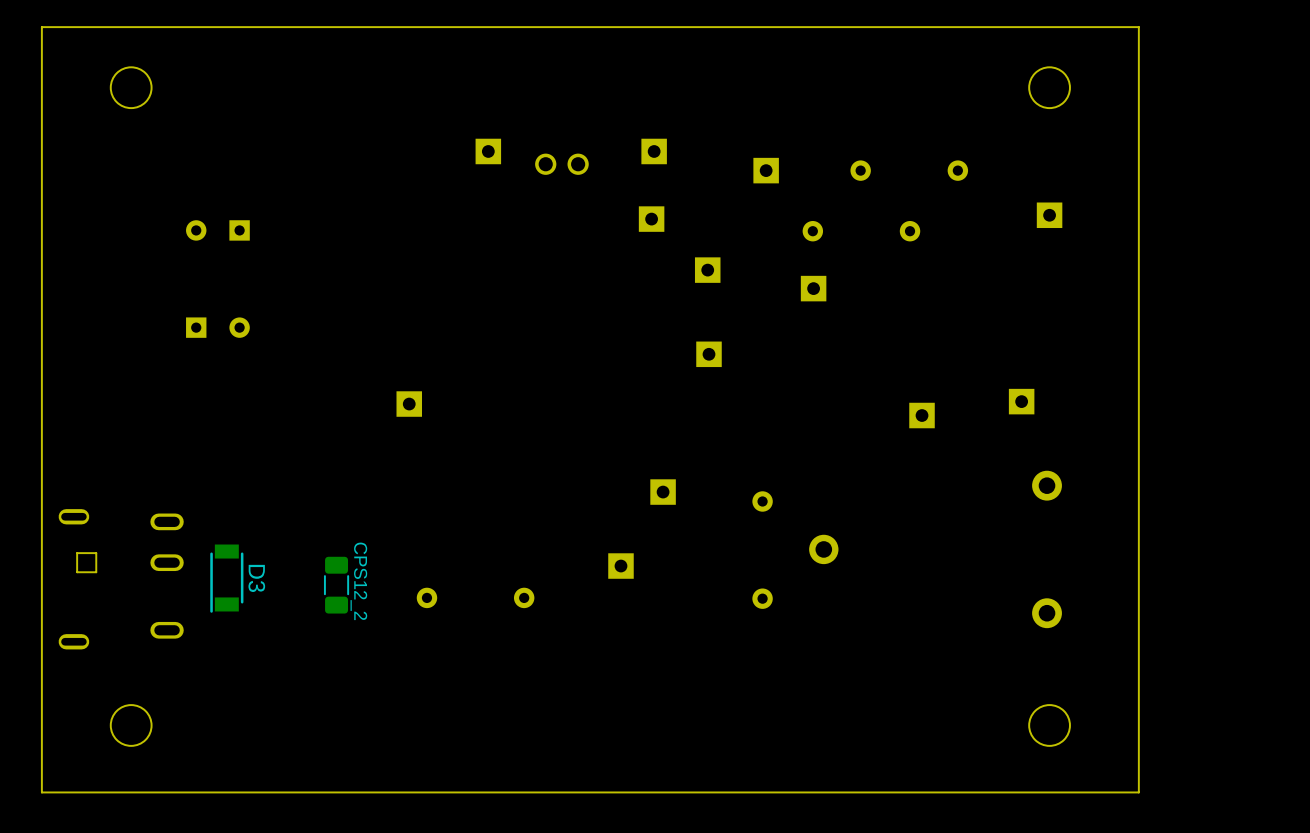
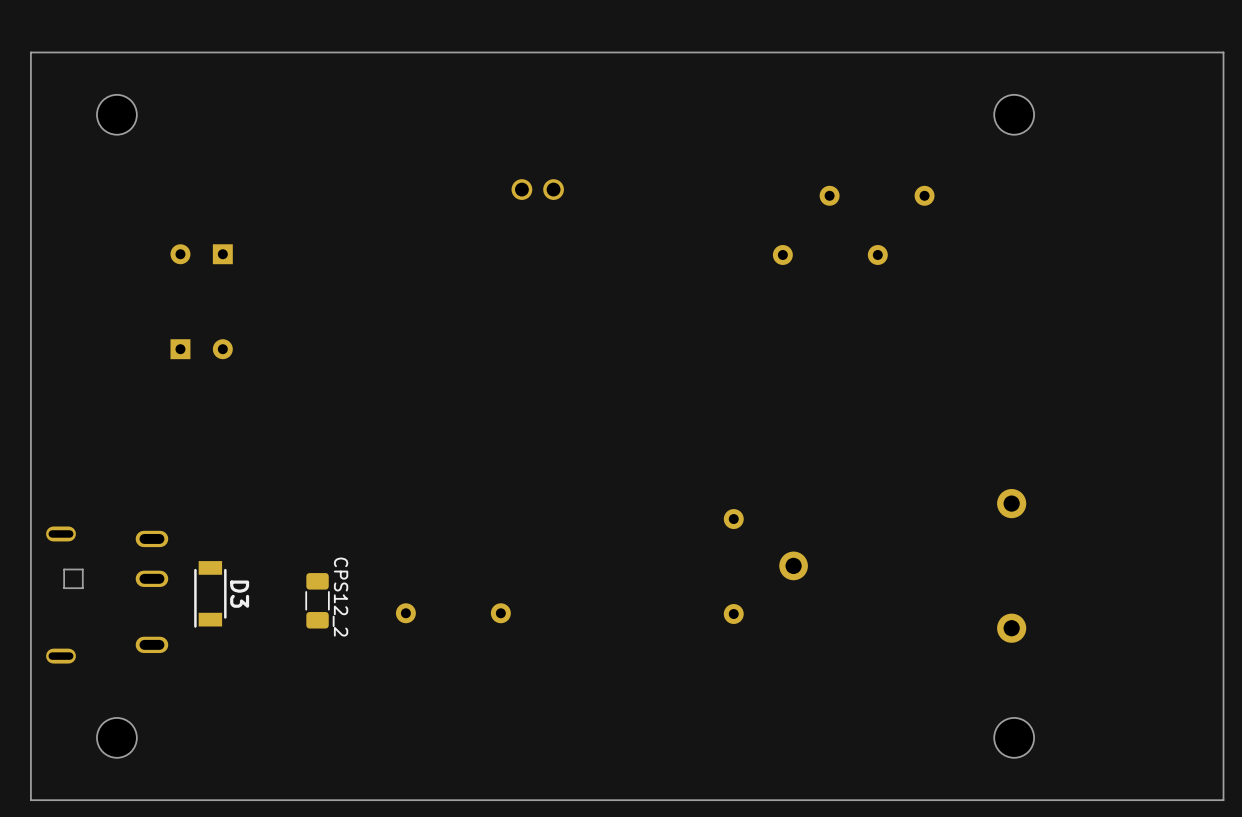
board edge: (1138, 27) (41, 27) (41, 792) (1138, 792) (1138, 27) -> (1223, 52) (1223, 800) (30, 800) (30, 52) (1223, 52)
part: (488, 151) -> none
part: (654, 151) -> none
part: (766, 170) -> none
part: (1049, 215) -> none
part: (651, 219) -> none
part: (707, 270) -> none
part: (813, 288) -> none
part: (709, 354) -> none
part: (1021, 401) -> none
part: (409, 404) -> none
part: (922, 415) -> none
part: (663, 492) -> none
part: (620, 566) -> none

